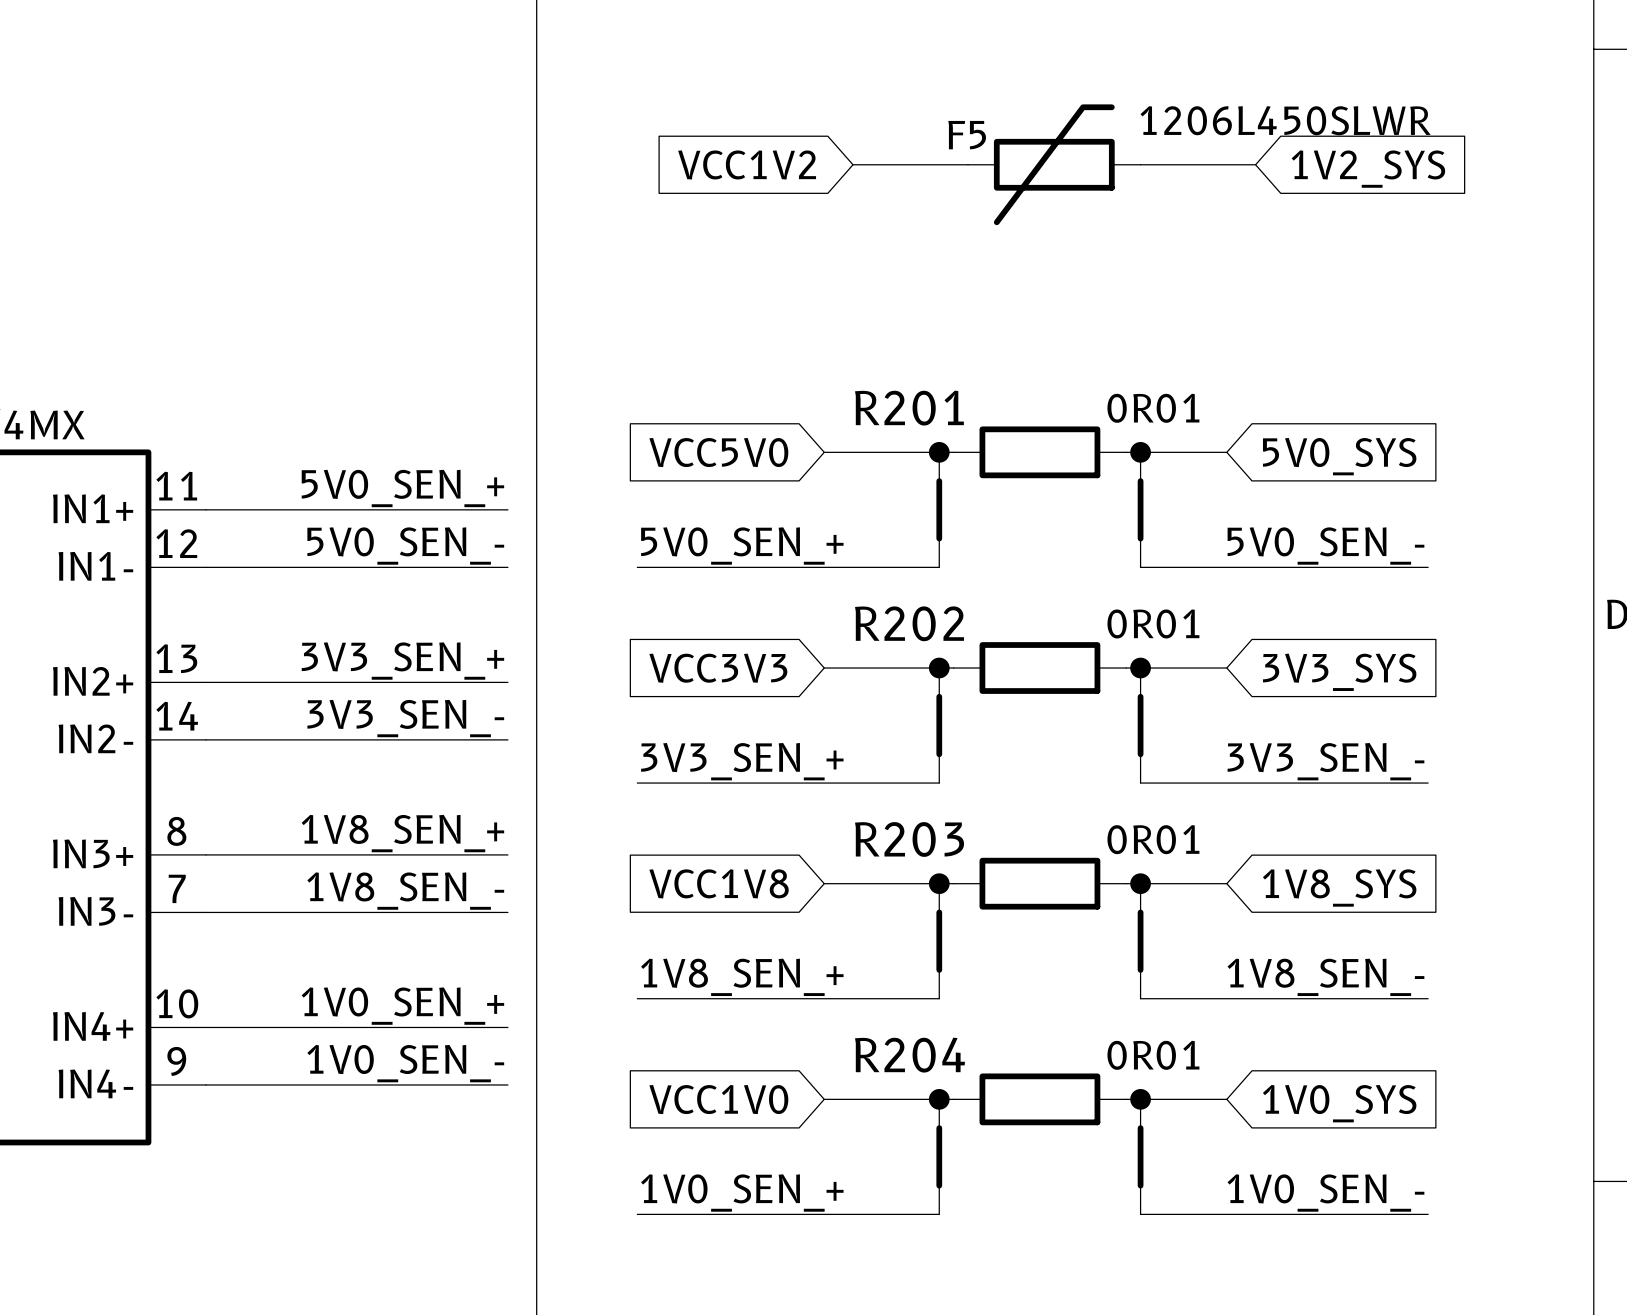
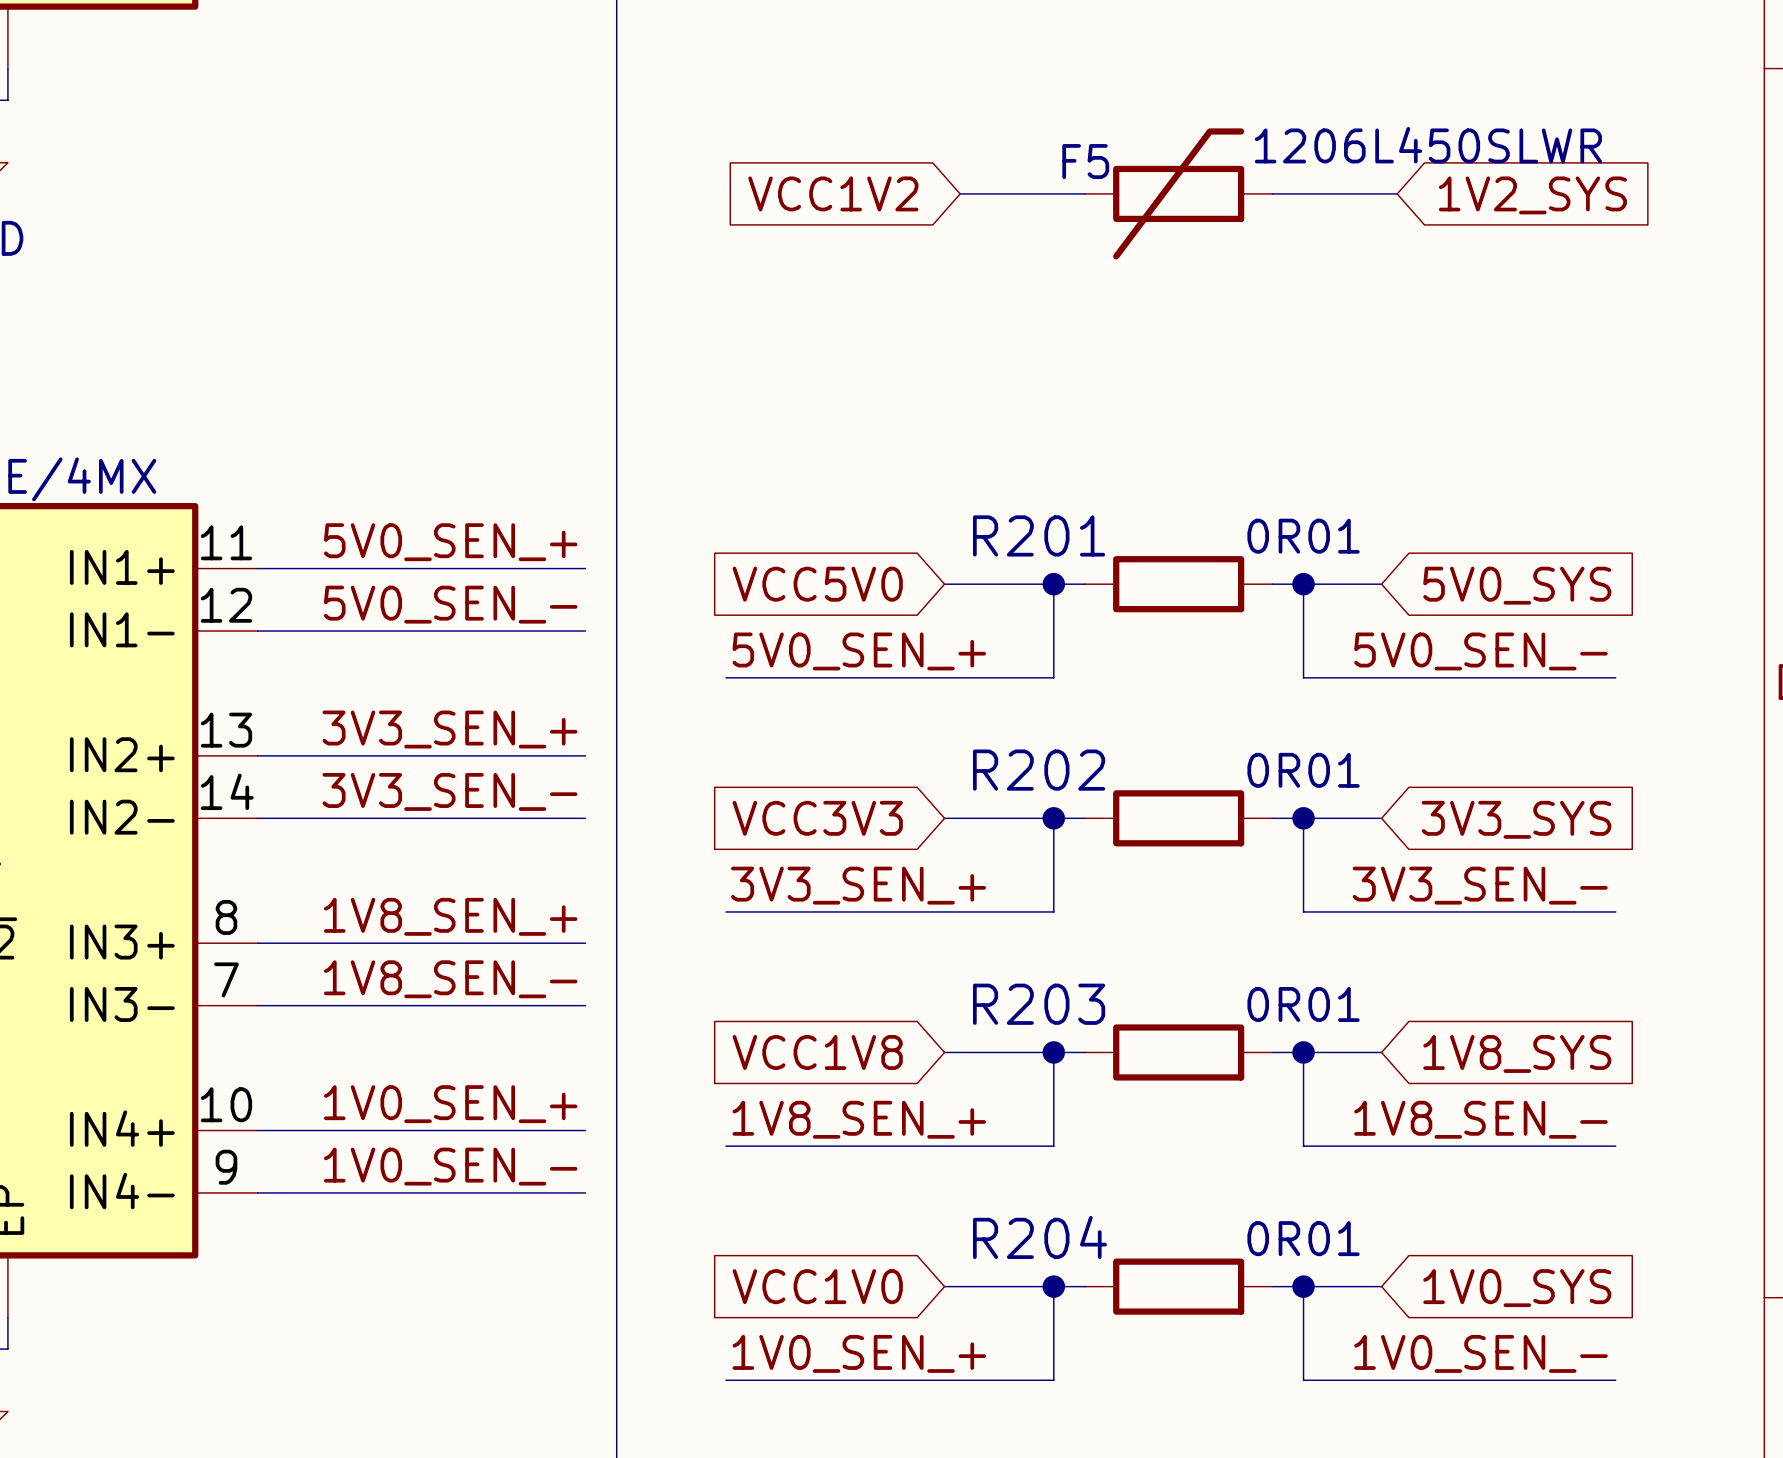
global label position: VCC5V0 (718, 452) -> VCC5V0 (817, 584)
wire: (824, 452) (953, 452) -> (944, 584) (1085, 584)
junction: (939, 452) -> none
R201 position: (1039, 452) -> (1178, 584)
wire: (1126, 452) (1226, 452) -> (1272, 584) (1381, 584)
junction: (1140, 452) -> none
global label position: 5V0_SYS (1339, 456) -> 5V0_SYS (1517, 585)
part: (939, 509) -> none
part: (1140, 509) -> none
wire: none -> (1053, 584) (1053, 677) (725, 677)
junction: none -> (1053, 584)
wire: none -> (1303, 584) (1303, 677) (1615, 677)
junction: none -> (1303, 584)
label position: 5V0_SEN_+ (742, 546) -> 5V0_SEN_+ (859, 651)
label position: 5V0_SEN_- (1325, 546) -> 5V0_SEN_- (1480, 651)
wire: (637, 567) (939, 567) -> none
wire: (1140, 567) (1428, 567) -> none
global label position: VCC3V3 (718, 668) -> VCC3V3 (817, 818)
wire: (824, 668) (953, 668) -> (944, 818) (1085, 818)
junction: (939, 668) -> none
R202 position: (1039, 668) -> (1178, 818)
wire: (1126, 668) (1226, 668) -> (1272, 818) (1381, 818)
junction: (1140, 668) -> none
global label position: 3V3_SYS (1339, 672) -> 3V3_SYS (1516, 819)
part: (939, 725) -> none
part: (1140, 725) -> none
wire: none -> (1053, 818) (1053, 911) (725, 911)
junction: none -> (1053, 818)
wire: none -> (1303, 818) (1303, 911) (1615, 911)
junction: none -> (1303, 818)
label position: 3V3_SEN_+ (742, 761) -> 3V3_SEN_+ (858, 885)
label position: 3V3_SEN_- (1325, 761) -> 3V3_SEN_- (1480, 885)
wire: (637, 783) (939, 783) -> none
wire: (1140, 783) (1428, 783) -> none
global label position: VCC1V8 (719, 883) -> VCC1V8 (817, 1052)
wire: (824, 883) (953, 883) -> (944, 1052) (1085, 1052)
junction: (939, 883) -> none
R203 position: (1039, 883) -> (1178, 1052)
wire: (1126, 883) (1226, 883) -> (1272, 1052) (1381, 1052)
junction: (1140, 883) -> none
global label position: 1V8_SYS (1339, 887) -> 1V8_SYS (1517, 1053)
part: (939, 941) -> none
part: (1140, 941) -> none
wire: none -> (1053, 1052) (1053, 1146) (725, 1146)
junction: none -> (1053, 1052)
wire: none -> (1303, 1052) (1303, 1146) (1615, 1146)
junction: none -> (1303, 1052)
label position: 1V8_SEN_+ (742, 977) -> 1V8_SEN_+ (859, 1119)
label position: 1V8_SEN_- (1325, 977) -> 1V8_SEN_- (1480, 1119)
wire: (637, 998) (939, 998) -> none
wire: (1140, 998) (1428, 998) -> none
global label position: VCC1V0 (718, 1099) -> VCC1V0 (817, 1286)
wire: (824, 1099) (953, 1099) -> (944, 1286) (1085, 1286)
junction: (939, 1099) -> none
R204 position: (1039, 1099) -> (1178, 1286)
wire: (1126, 1099) (1226, 1099) -> (1272, 1286) (1381, 1286)
junction: (1140, 1099) -> none
global label position: 1V0_SYS (1339, 1103) -> 1V0_SYS (1517, 1288)
part: (939, 1156) -> none
part: (1140, 1156) -> none
wire: none -> (1053, 1286) (1053, 1380) (725, 1380)
junction: none -> (1053, 1286)
wire: none -> (1303, 1286) (1303, 1380) (1615, 1380)
junction: none -> (1303, 1286)
label position: 1V0_SEN_+ (742, 1193) -> 1V0_SEN_+ (859, 1353)
label position: 1V0_SEN_- (1325, 1193) -> 1V0_SEN_- (1480, 1353)
wire: (637, 1214) (939, 1214) -> none
wire: (1140, 1214) (1428, 1214) -> none

